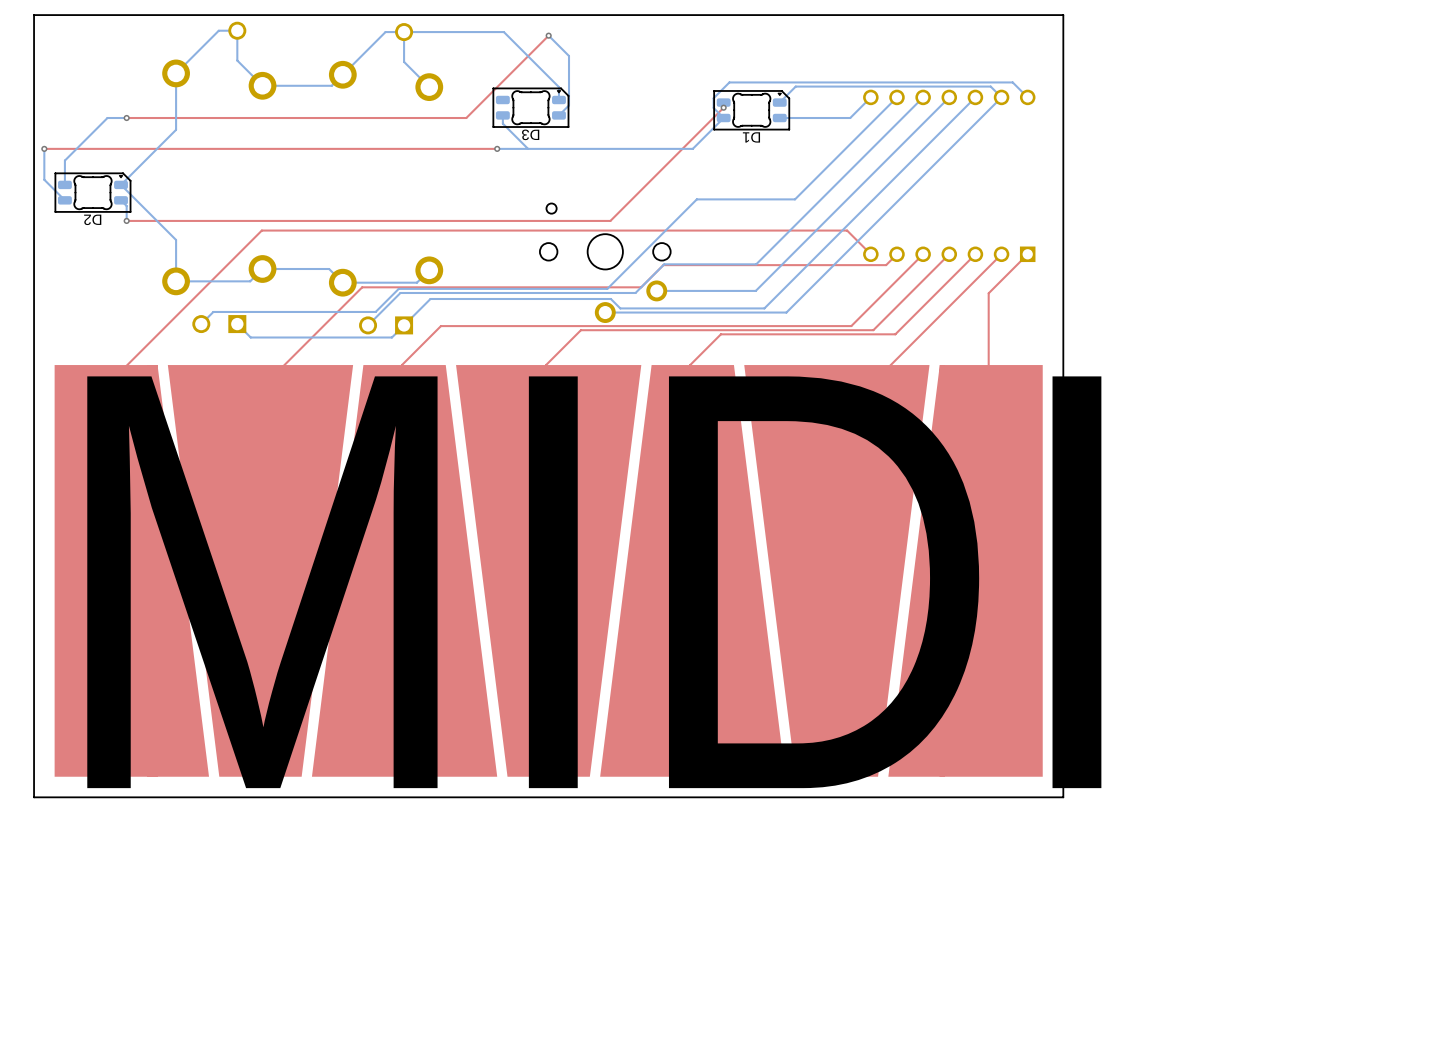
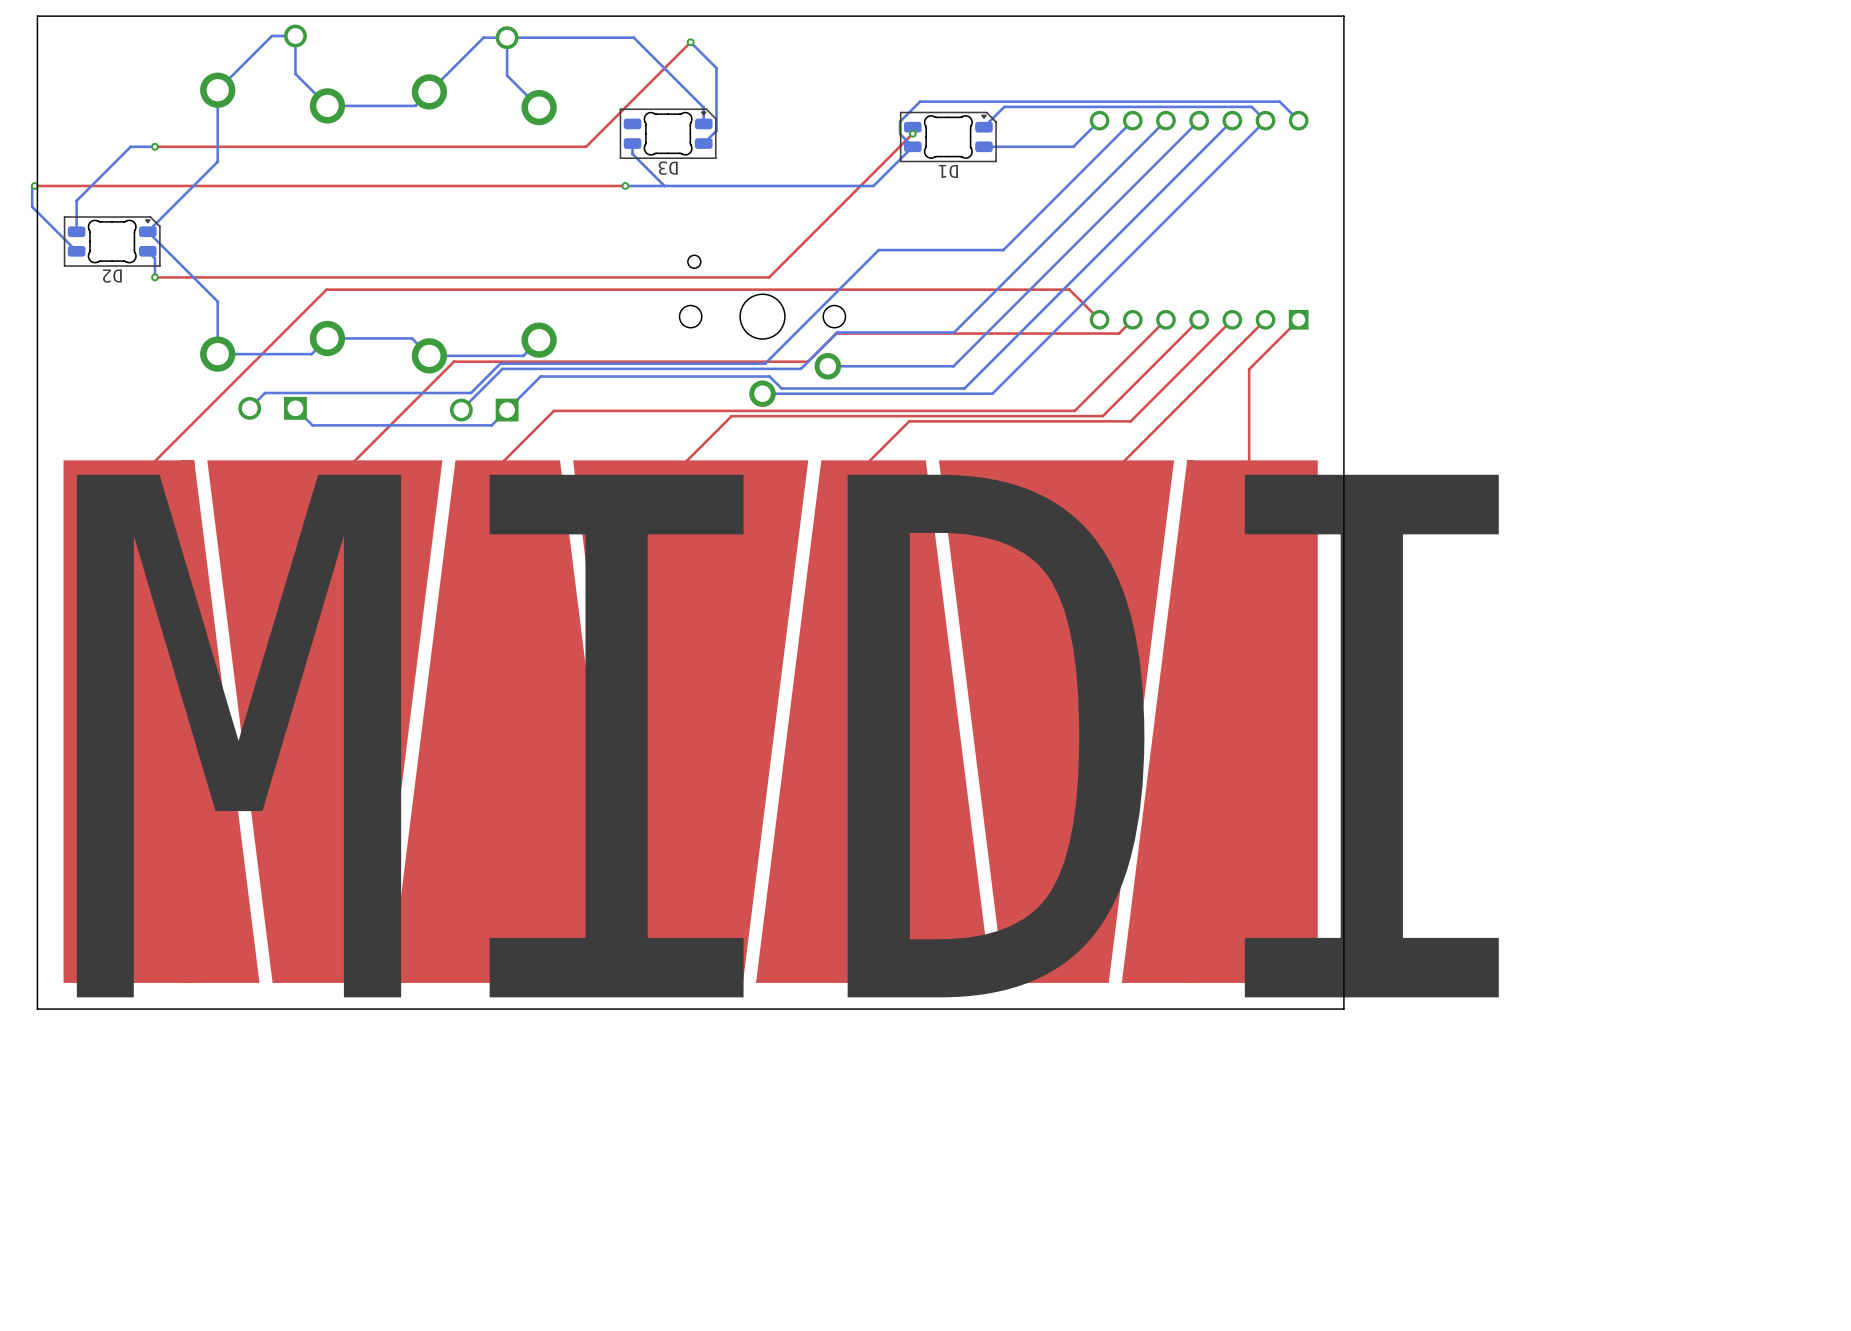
bottom track: (44, 148) (44, 179) -> (34, 185) (32, 185) (32, 206) (50, 225)
top track: none -> (50, 185) (34, 185)
via position: (44, 148) -> (34, 185)

